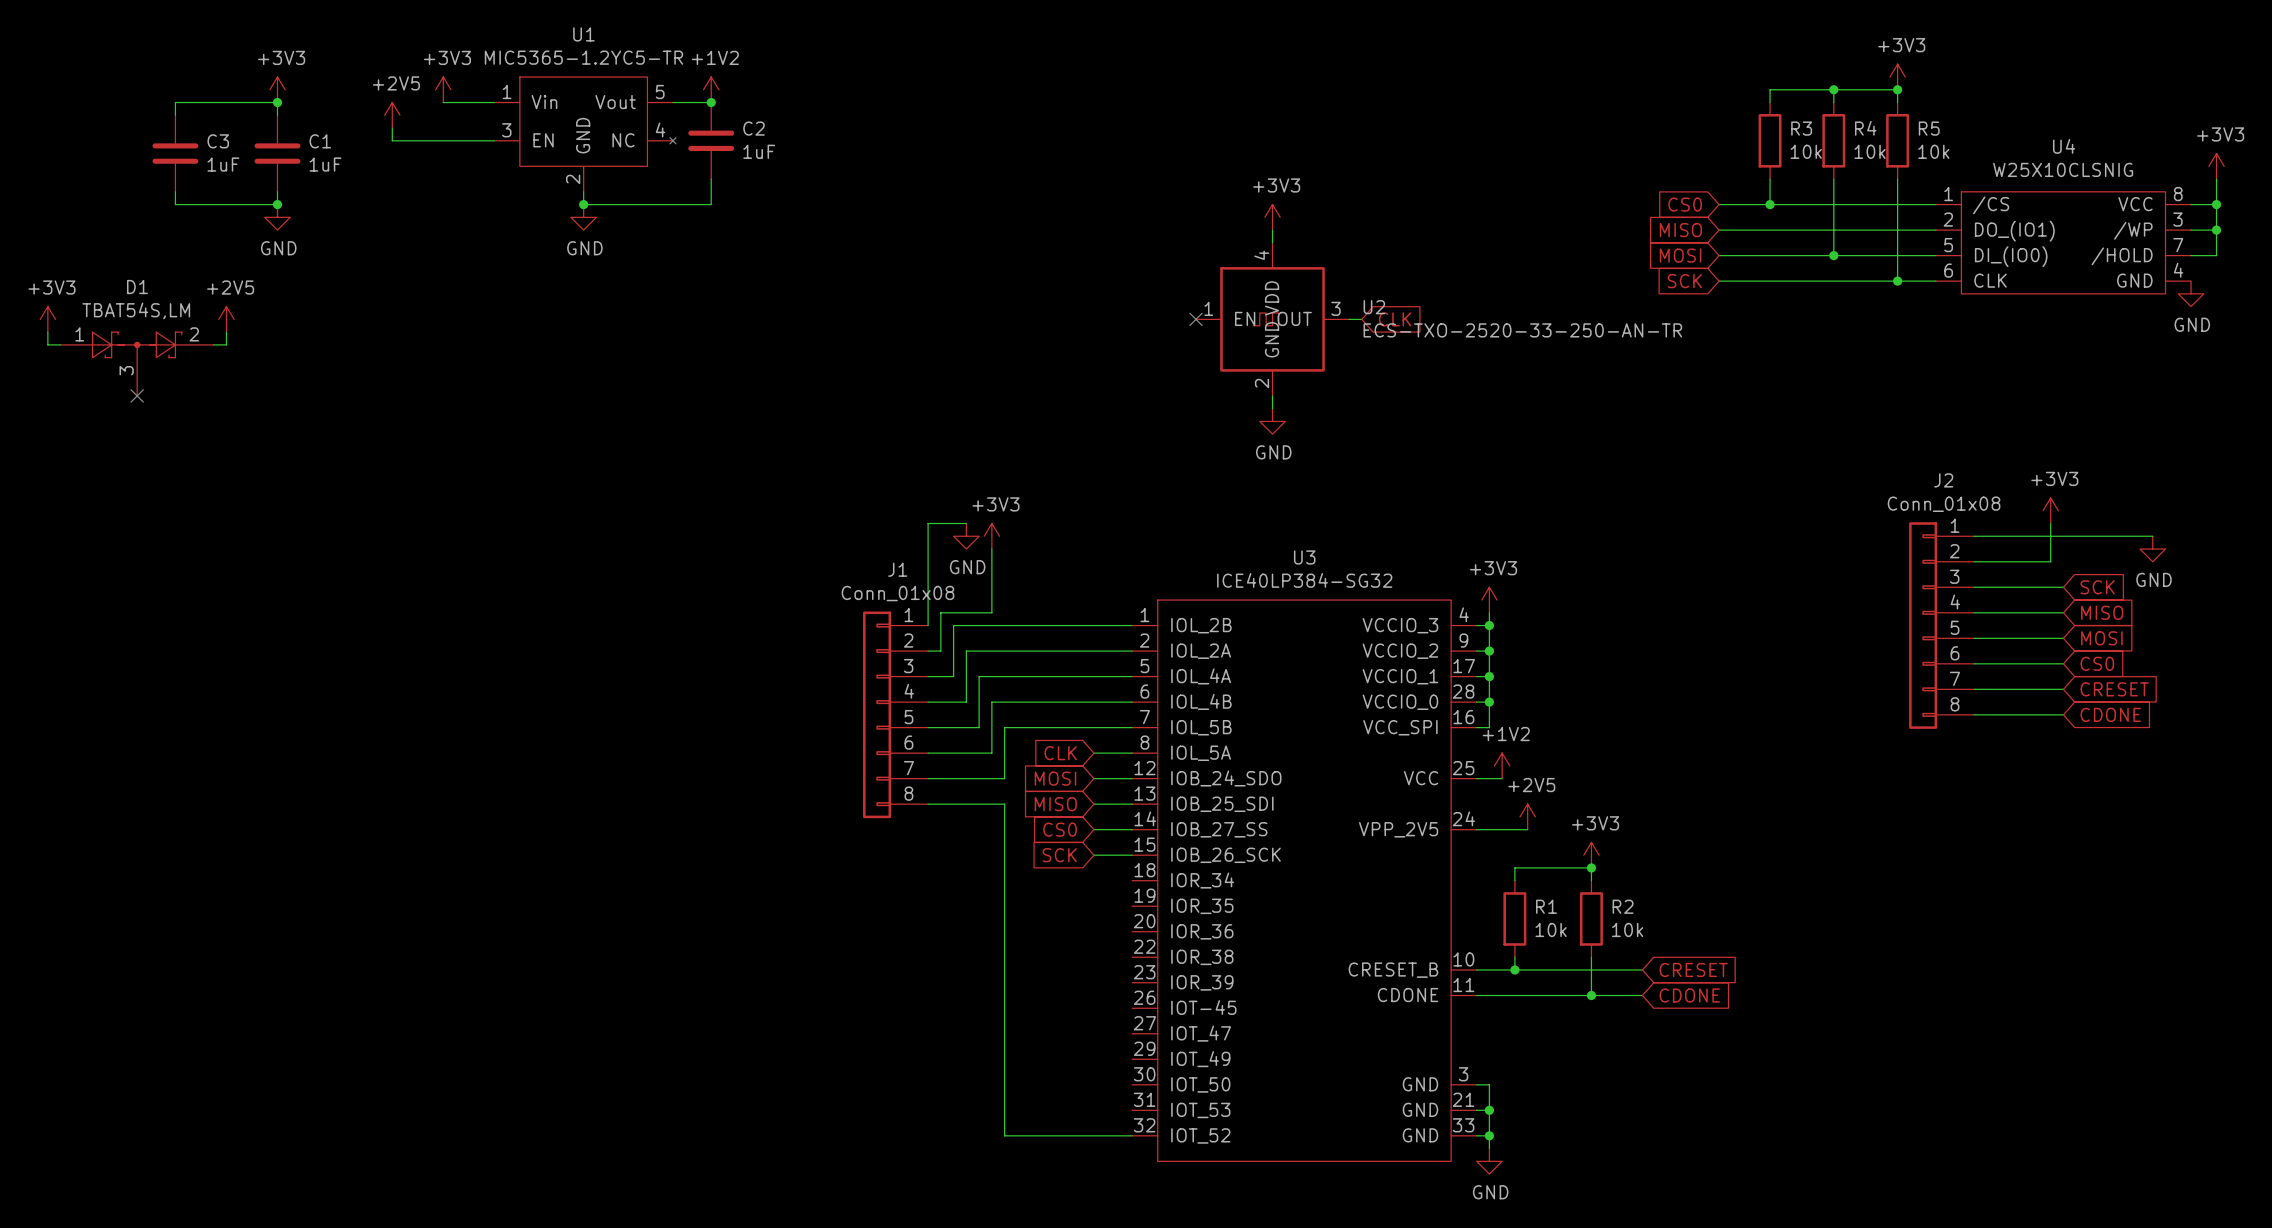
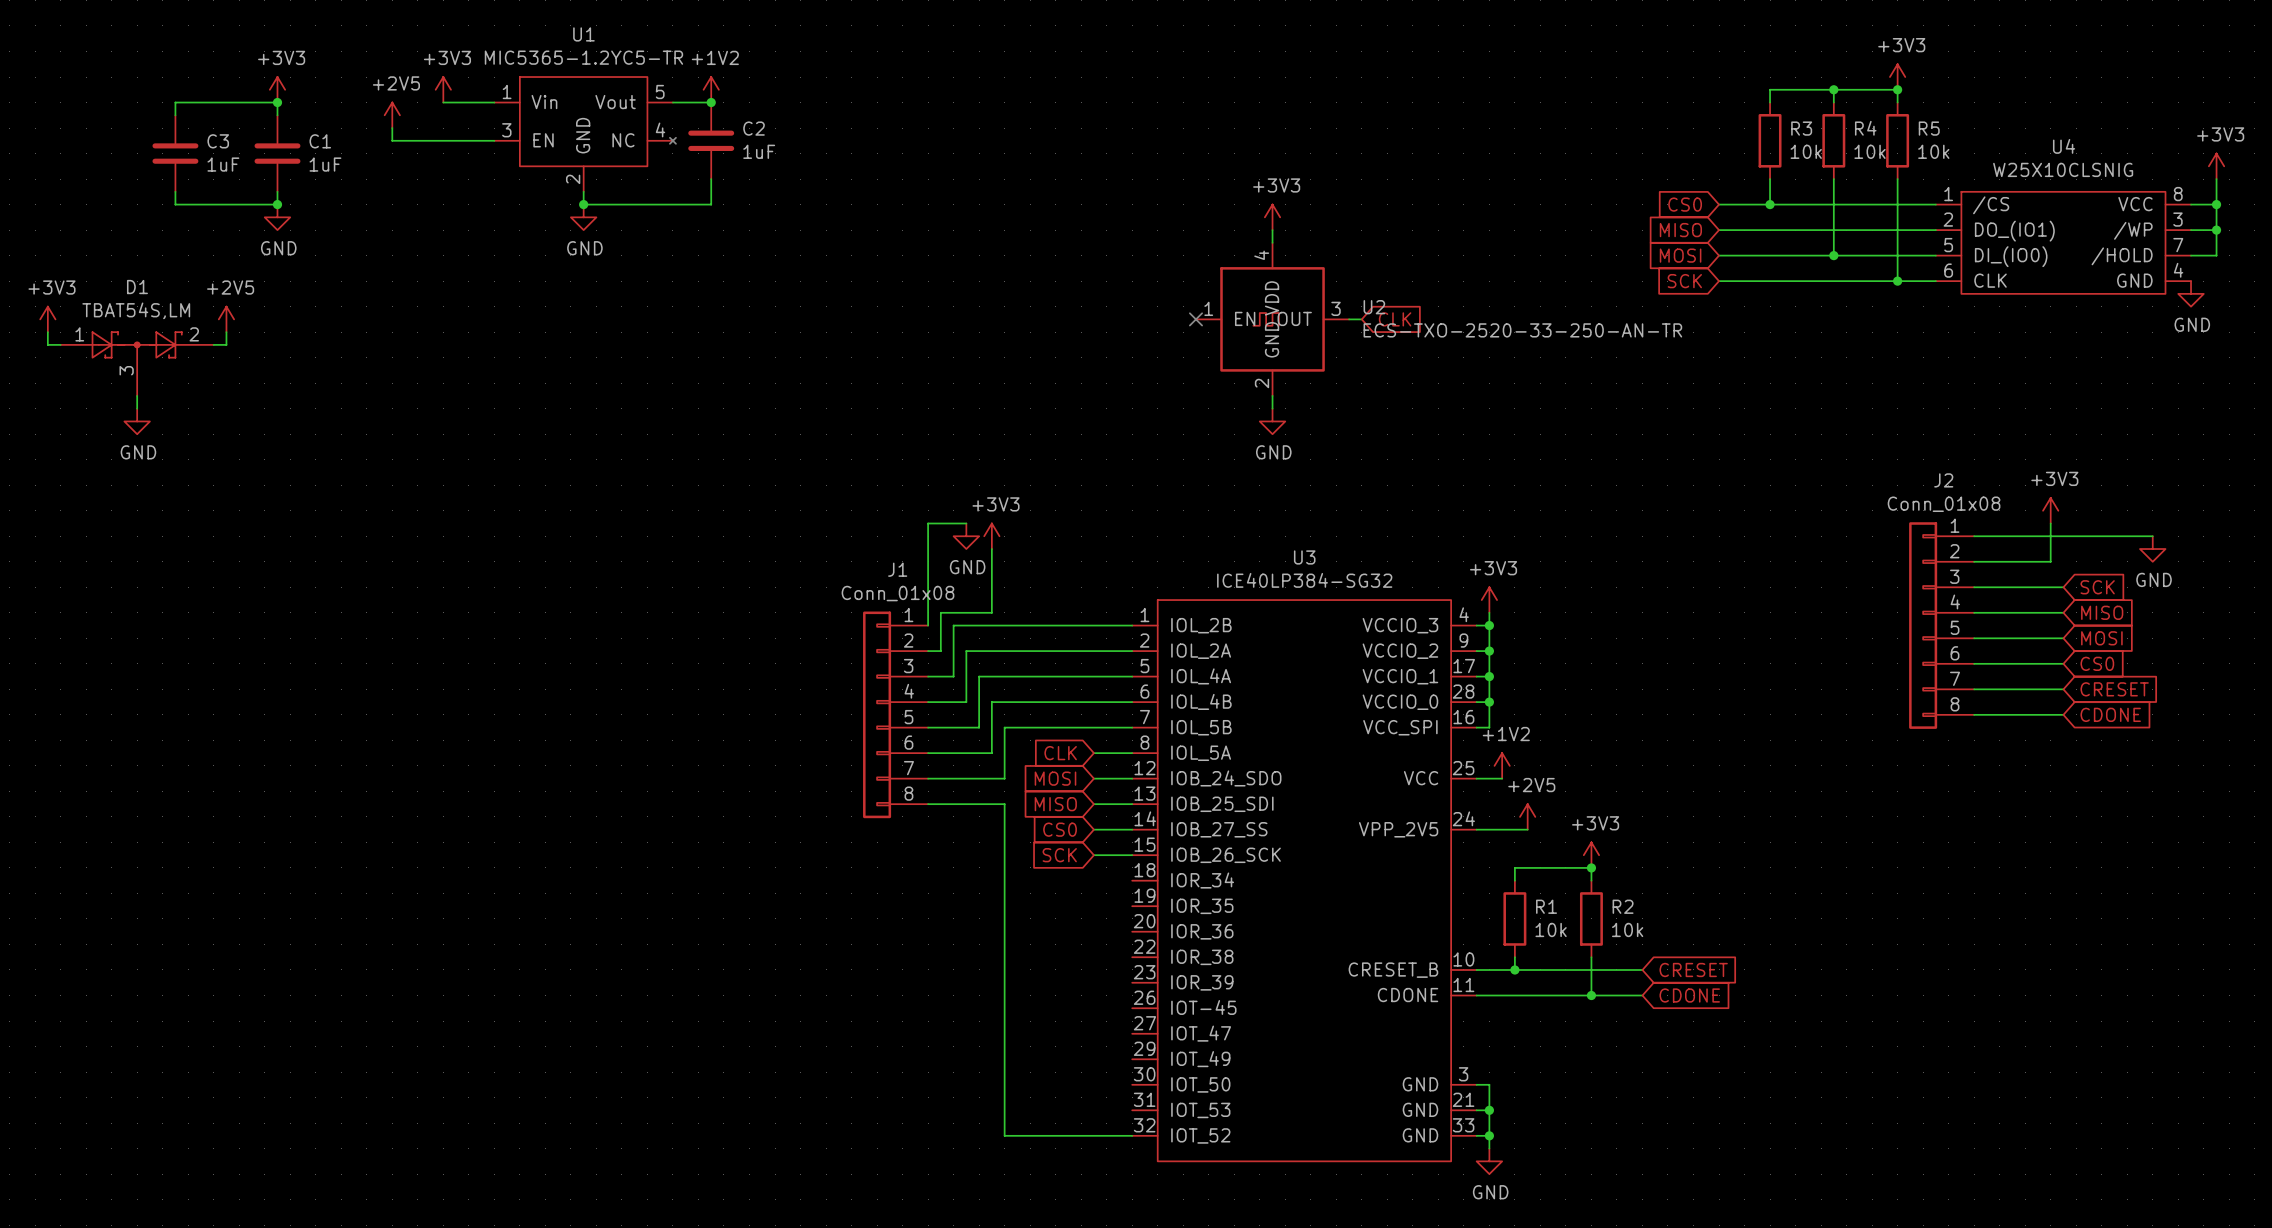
wire: none -> (137, 395) (137, 408)
no-connect mark: (137, 395) -> none
power symbol: none -> GND (137, 421)

